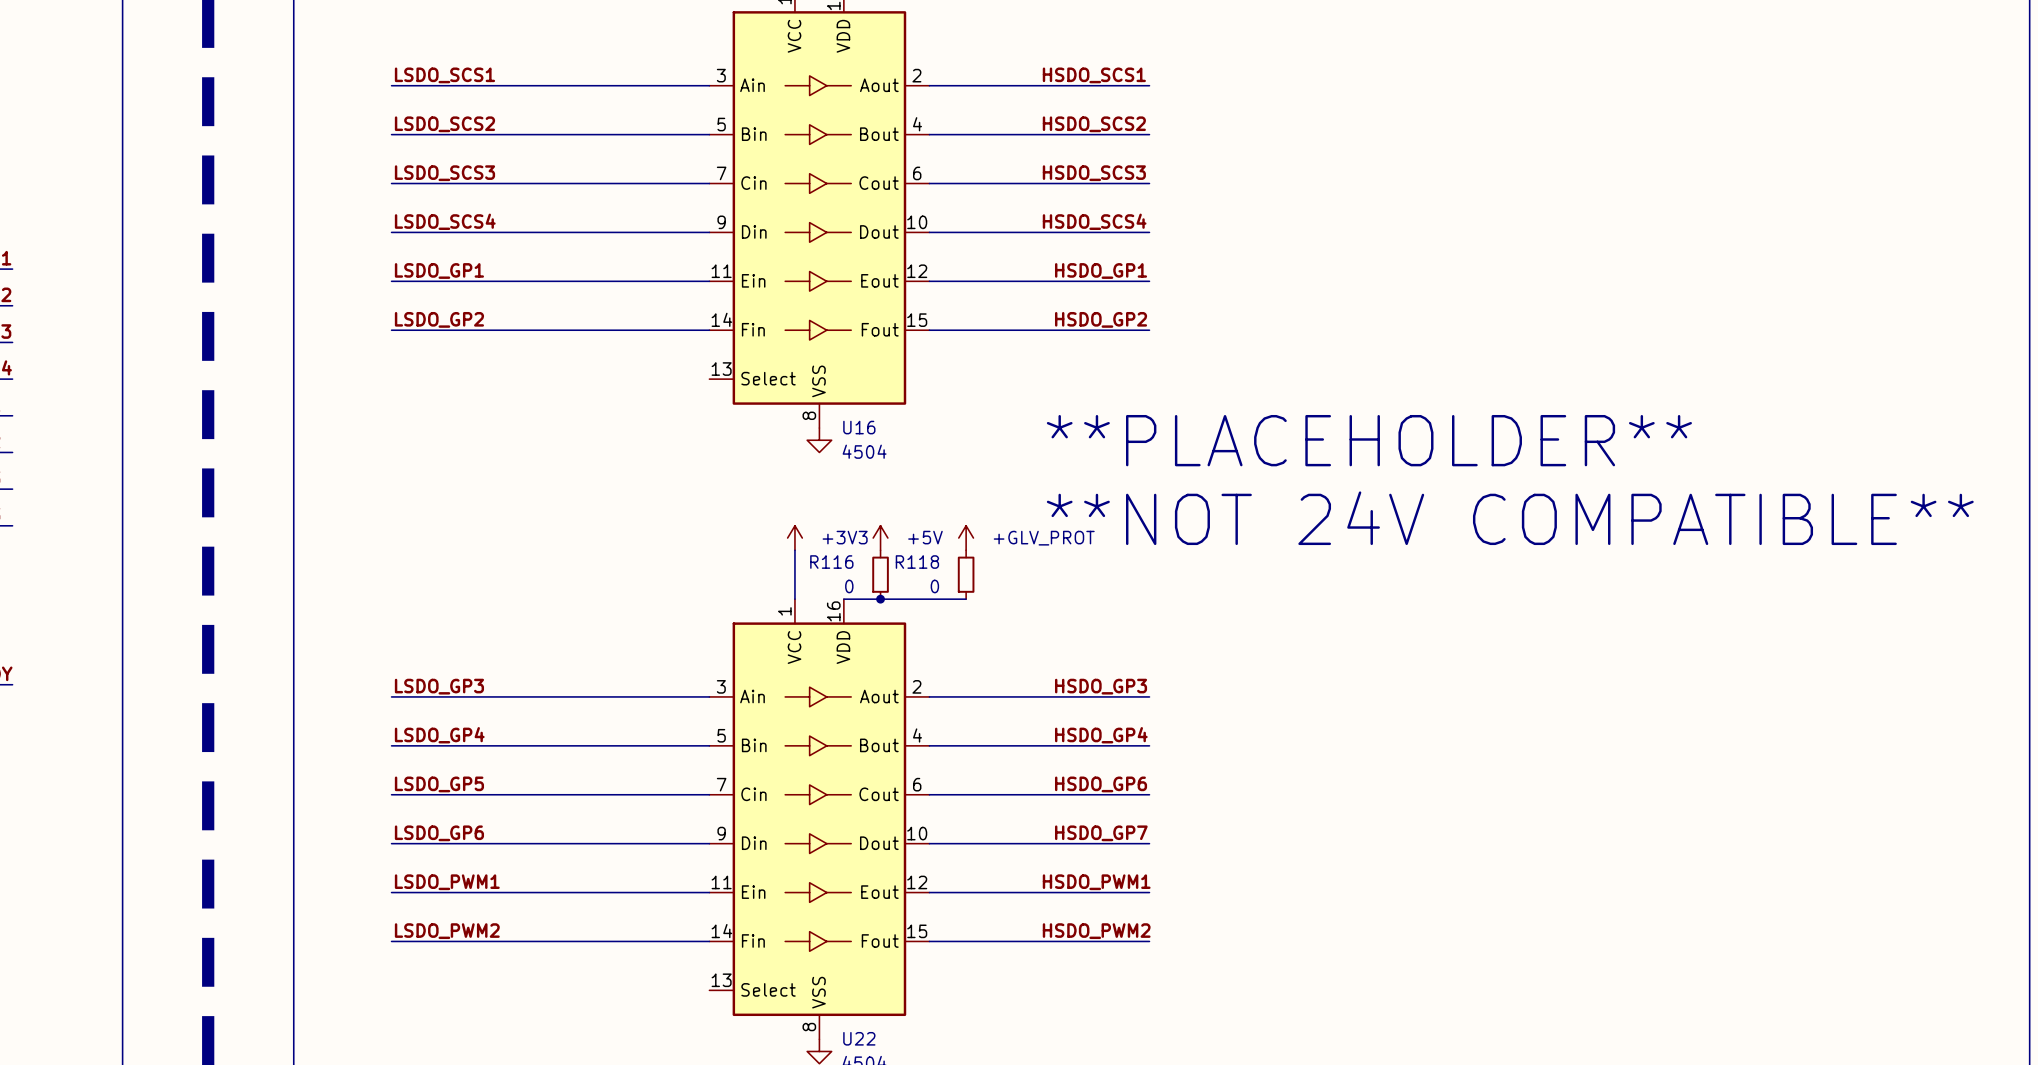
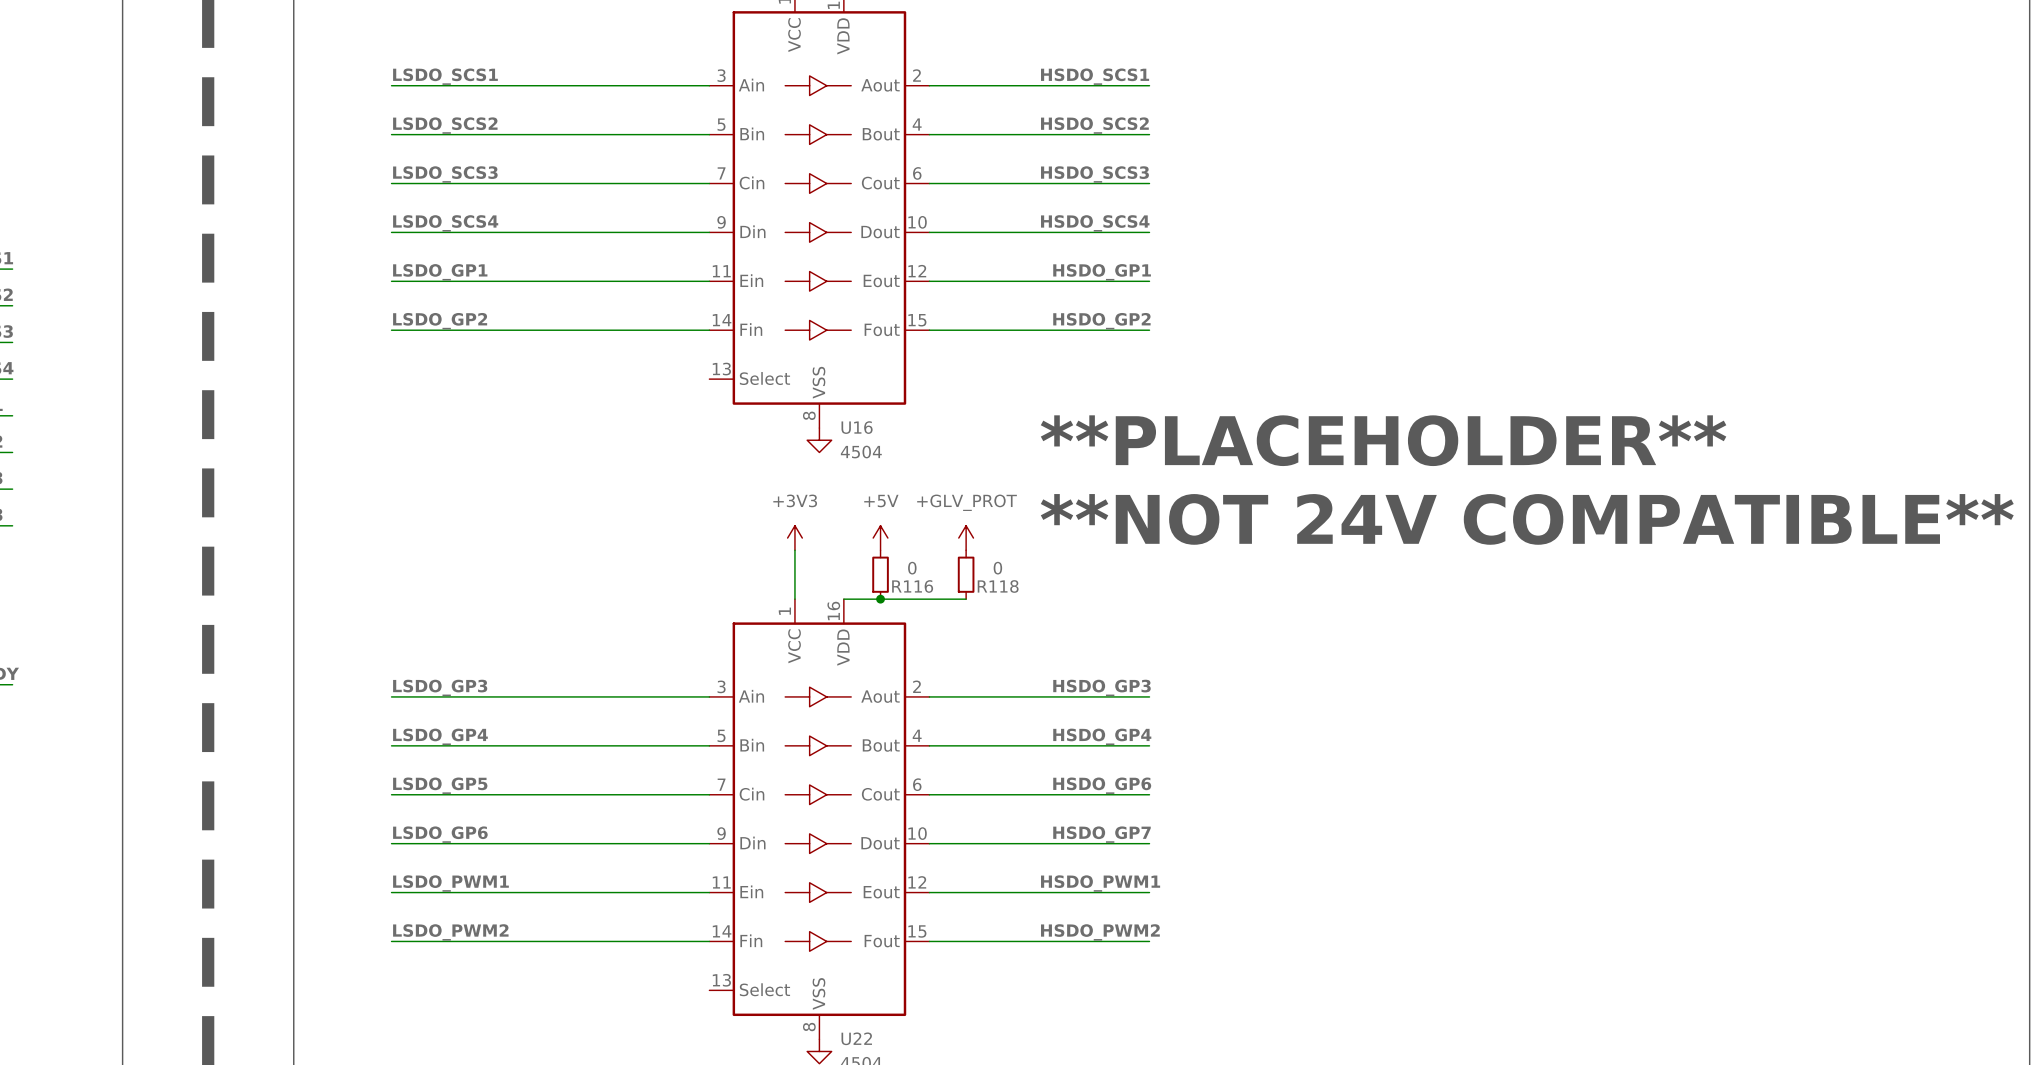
power symbol text position: +3V3 (845, 537) -> +3V3 (795, 500)
power symbol text position: +5V (925, 537) -> +5V (881, 501)
power symbol text position: +GLV_PROT (1044, 538) -> +GLV_PROT (967, 502)
R116 name position: R116 (831, 562) -> R116 (912, 586)
R118 name position: R118 (917, 562) -> R118 (998, 586)
R116 value position: 0 (849, 586) -> 0 (912, 568)
R118 value position: 0 (934, 586) -> 0 (997, 568)

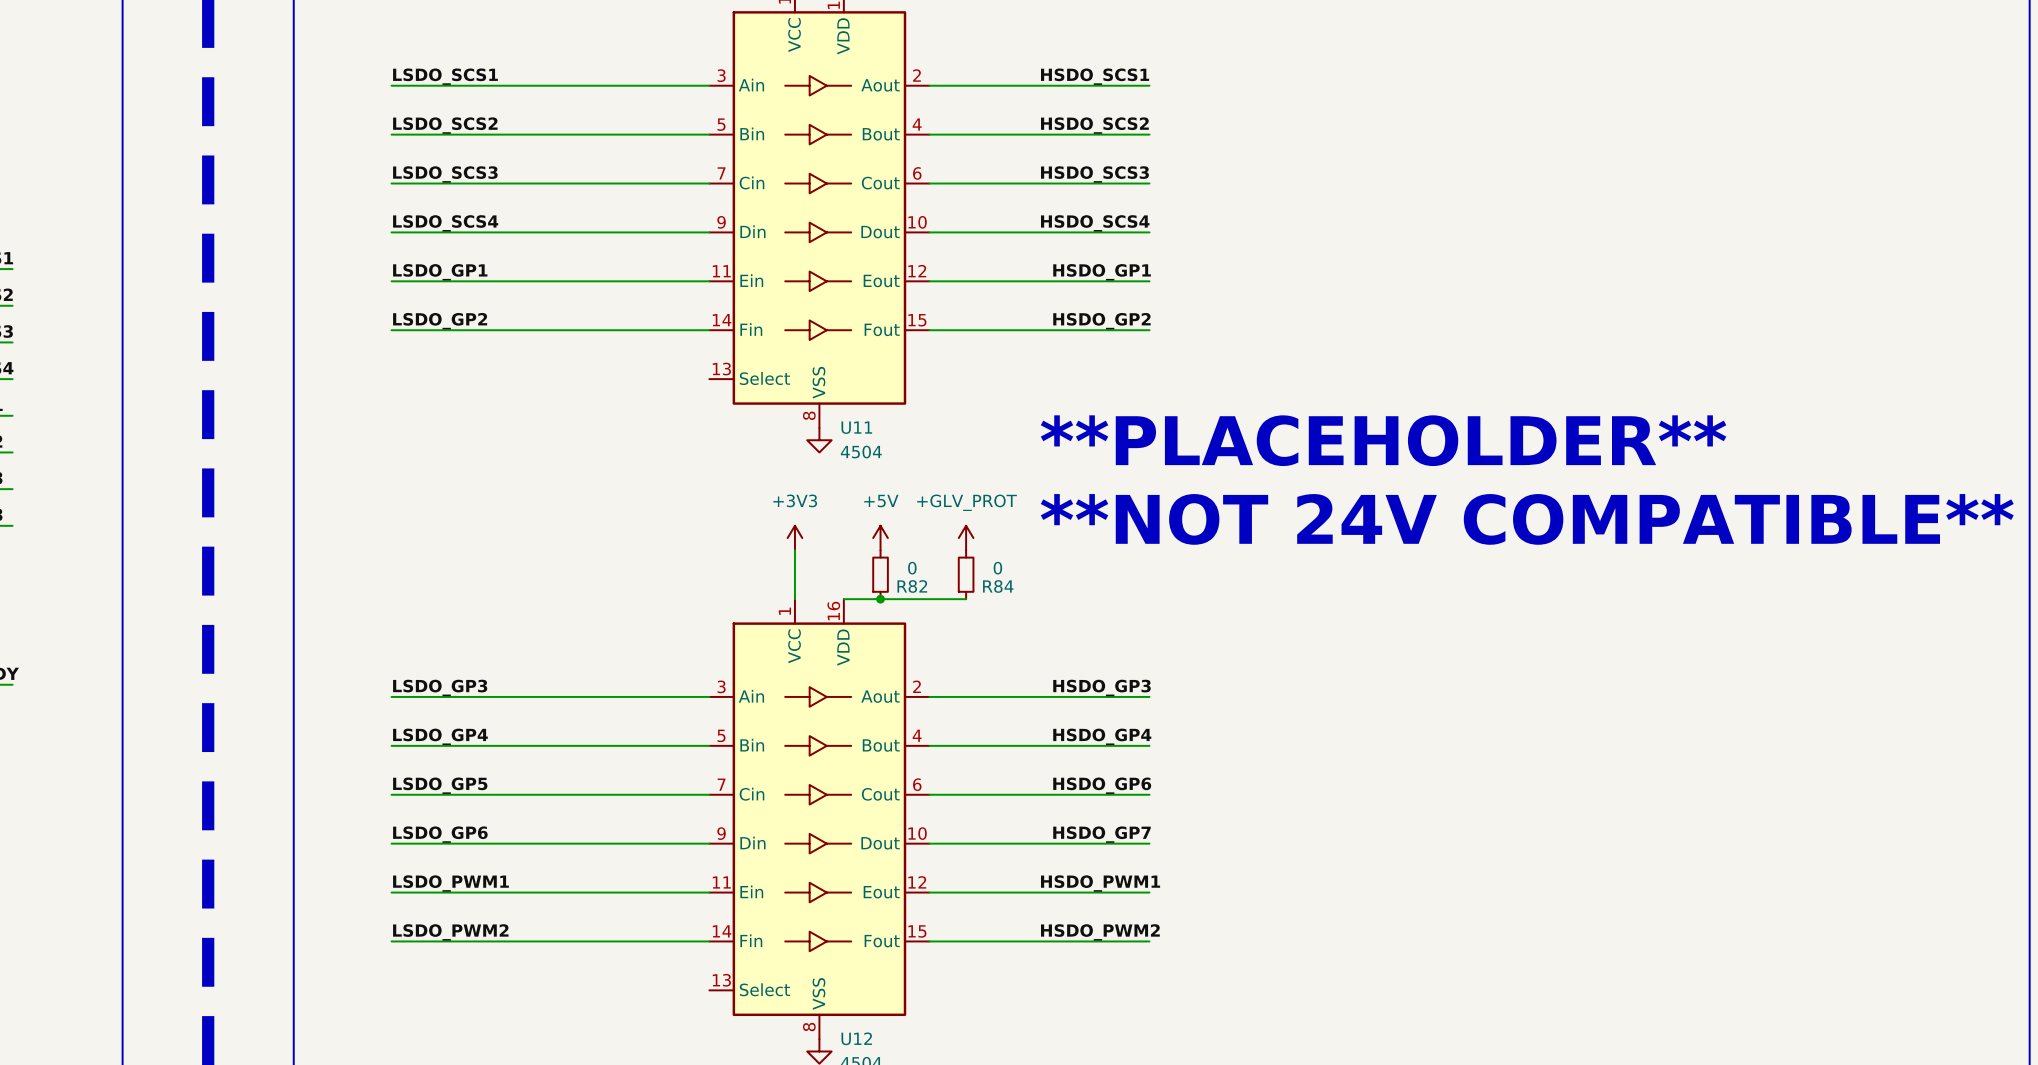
U16 name: U16 (857, 427) -> U11 (856, 427)
R116 name: R116 (912, 586) -> R82 (912, 586)
R118 name: R118 (998, 586) -> R84 (998, 586)
U22 name: U22 (856, 1038) -> U12 (856, 1038)

